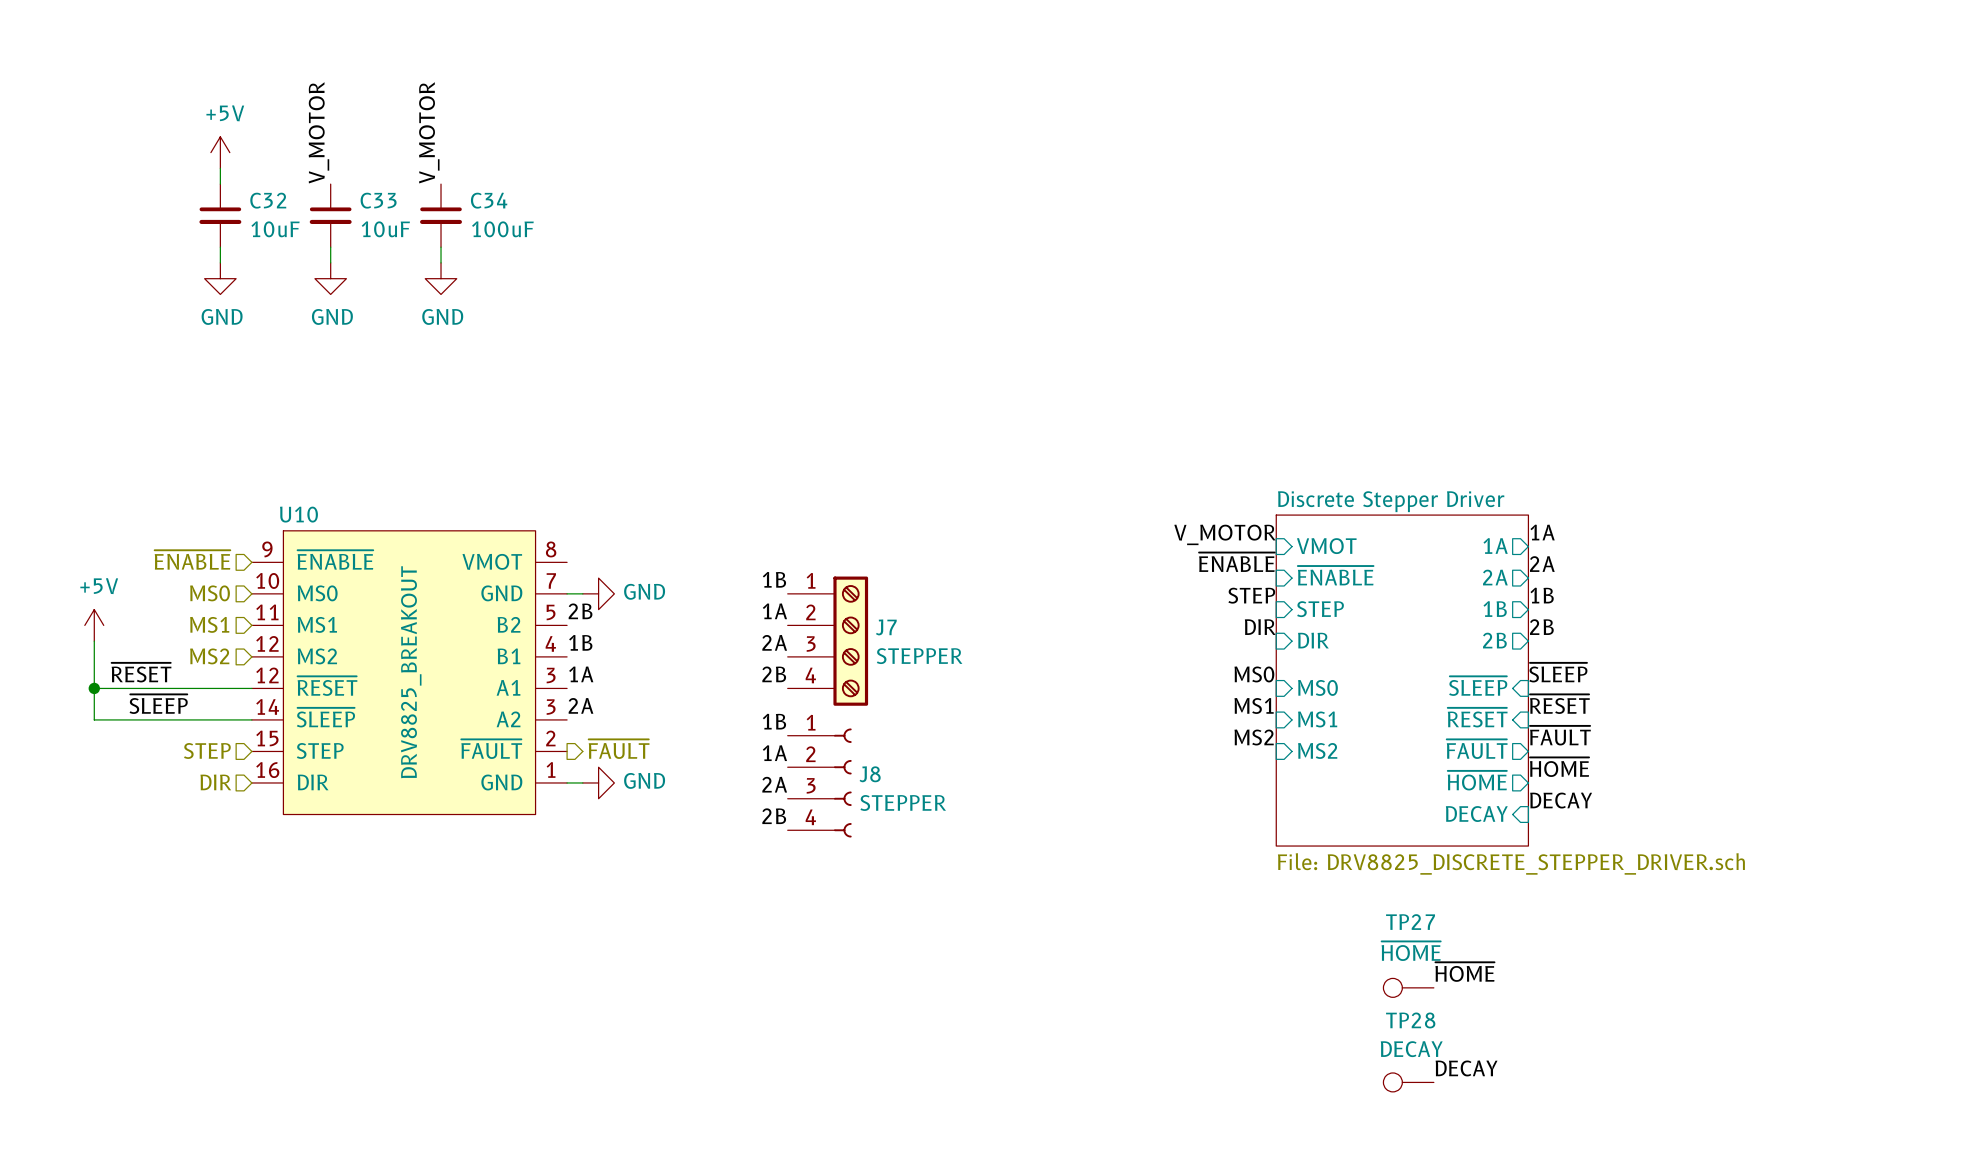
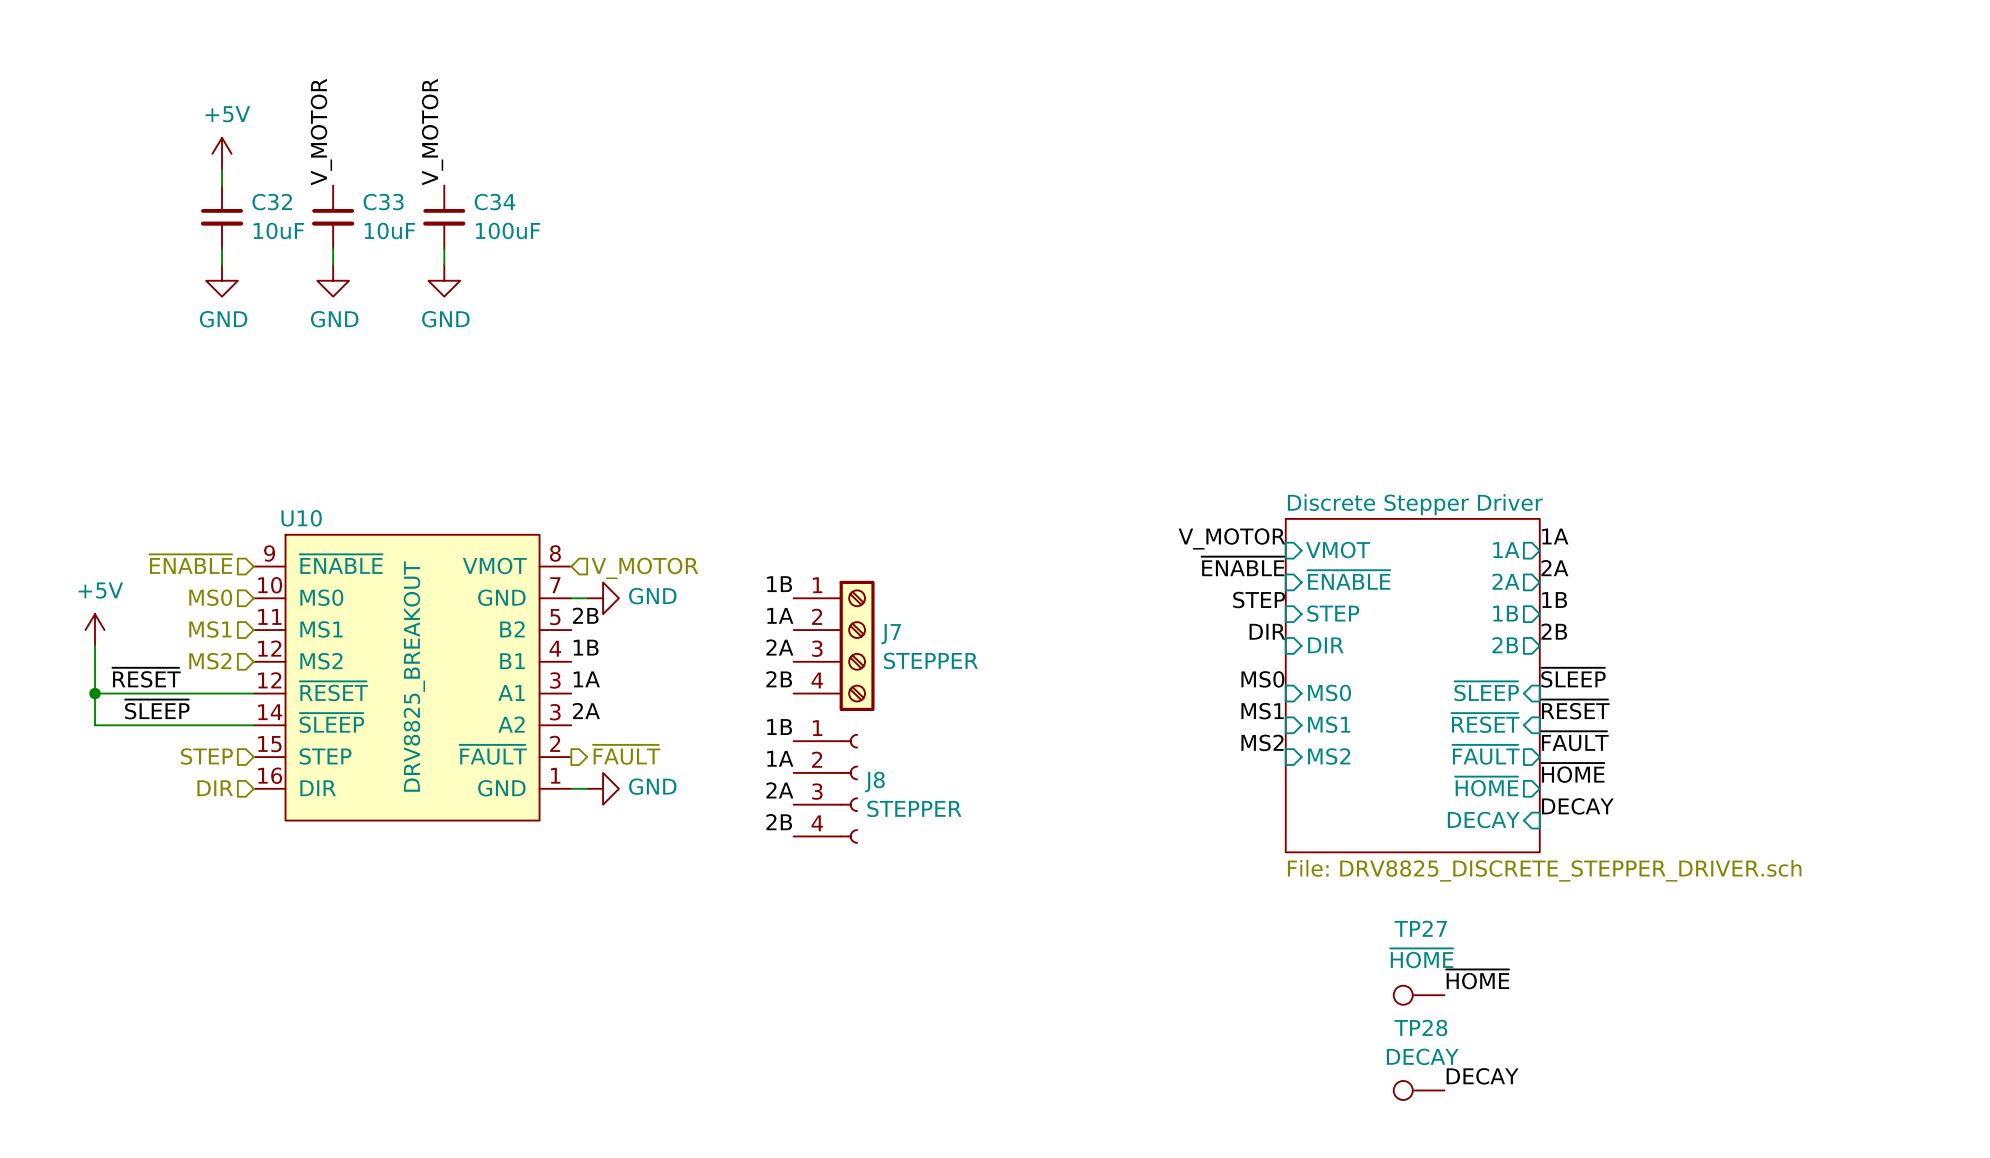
hierarchical label: none -> V_MOTOR (644, 568)

